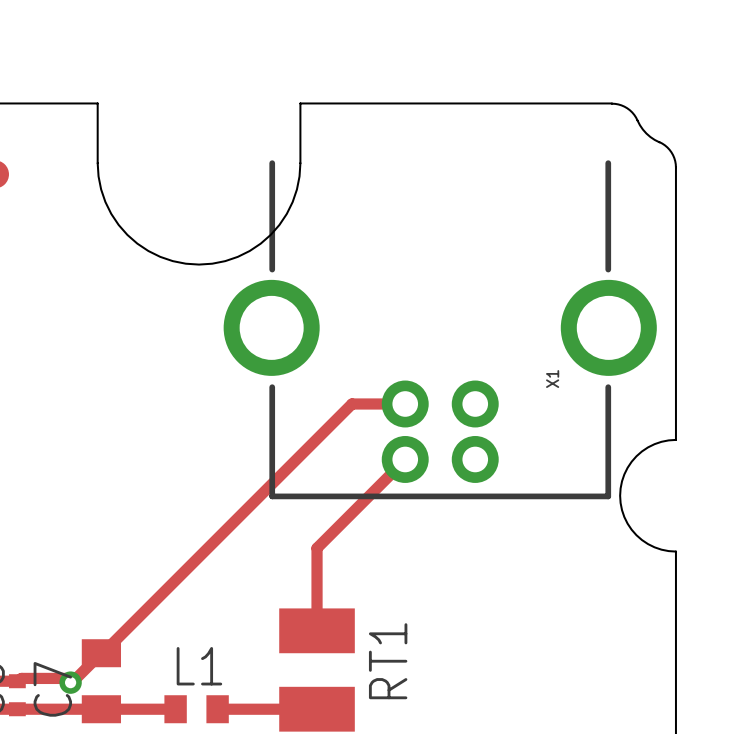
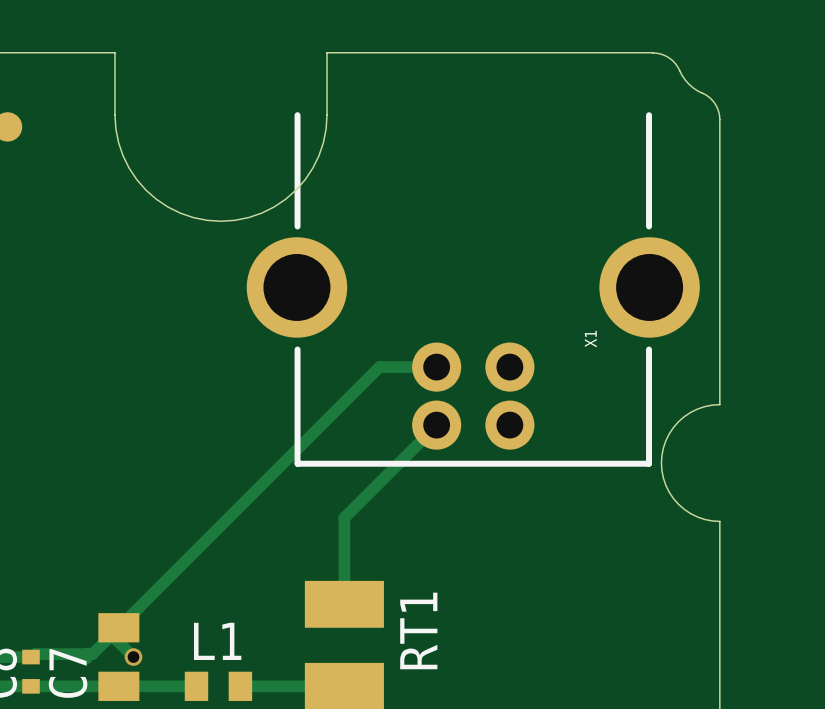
track: (352, 403) (101, 653) -> (381, 367) (118, 627) (113, 636) (133, 657)
via: none -> (133, 657)
via: (70, 682) -> none

